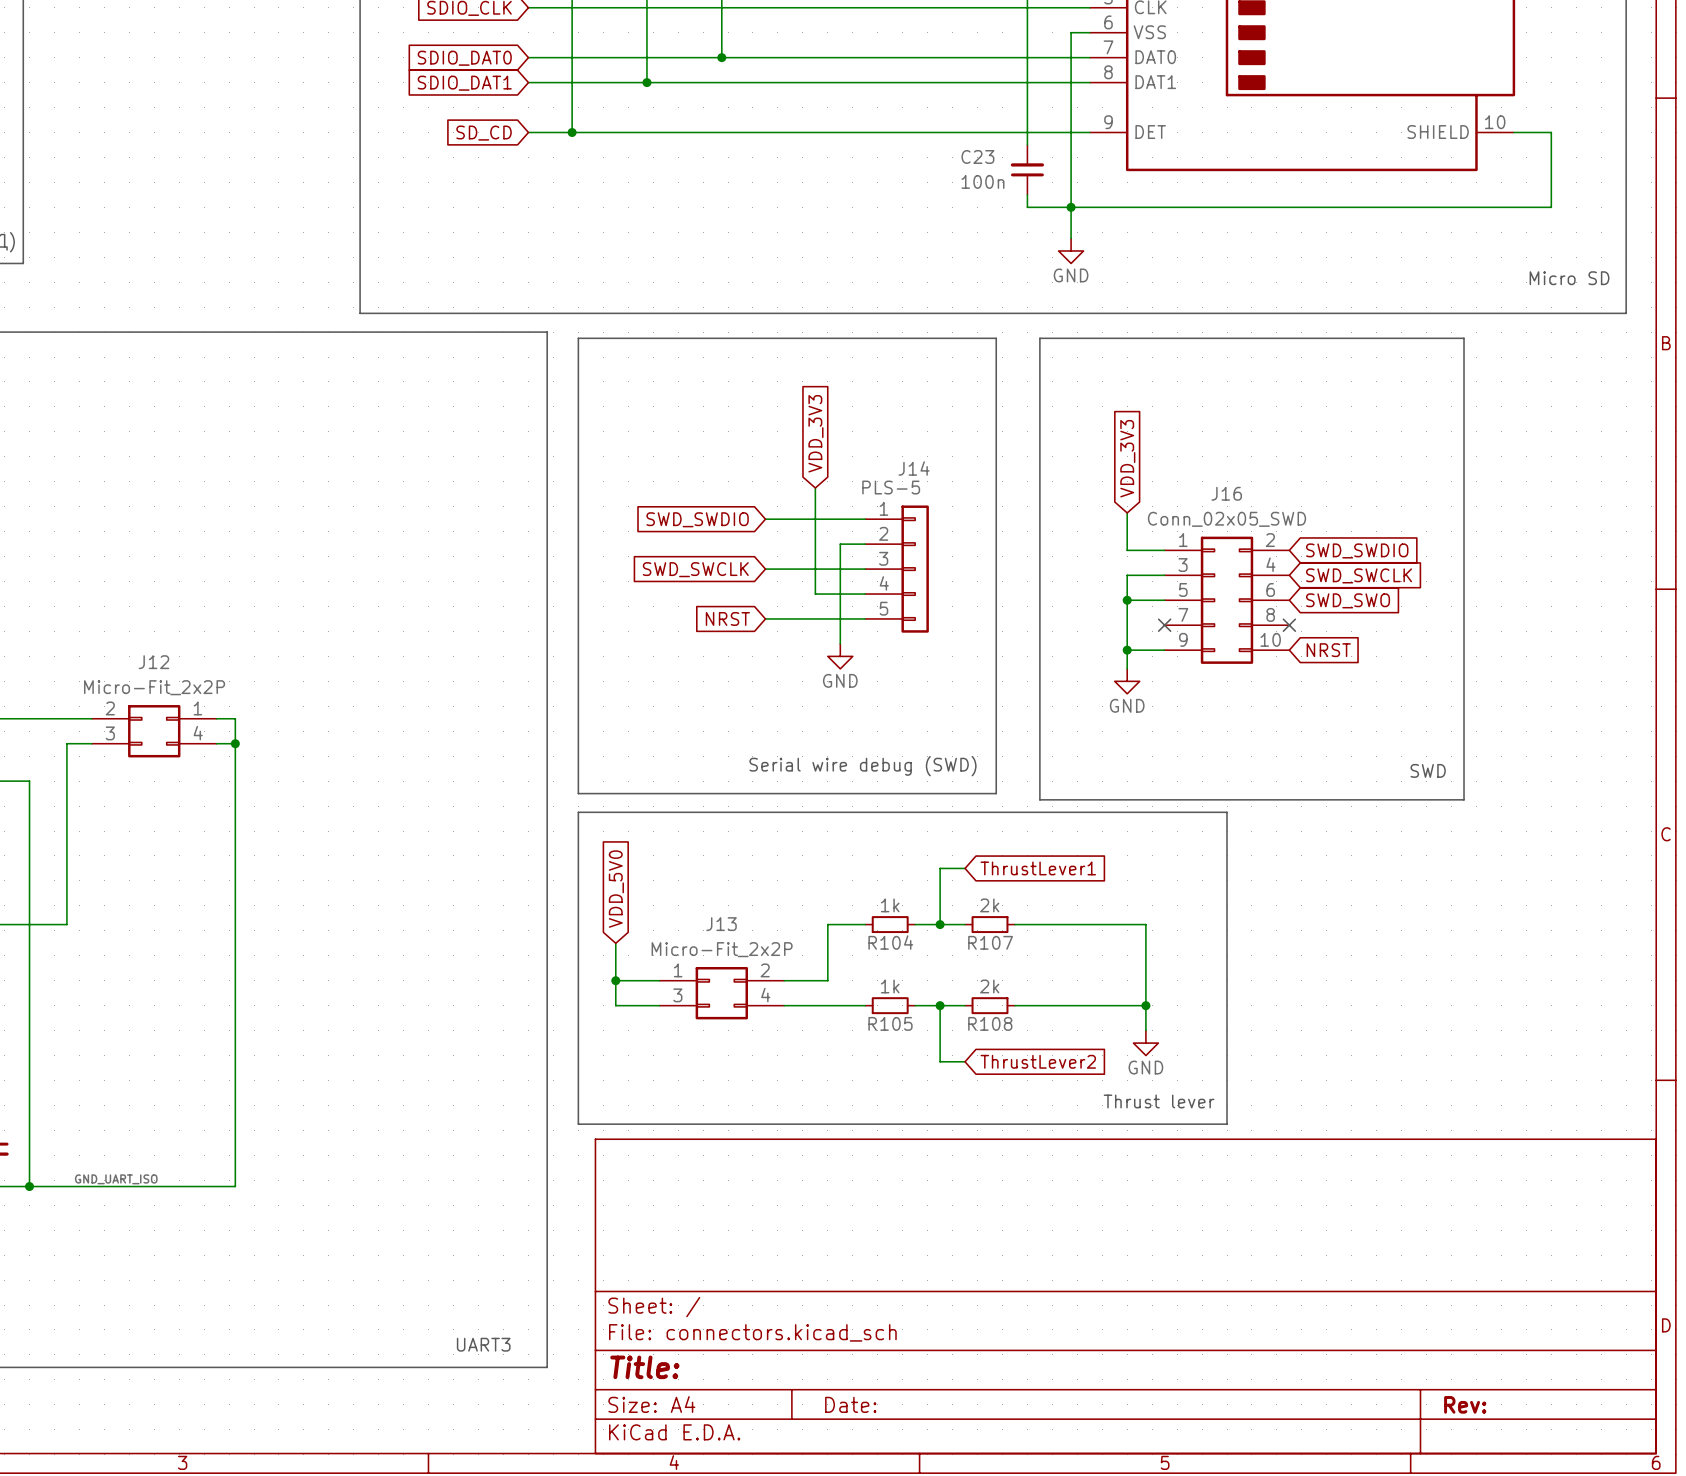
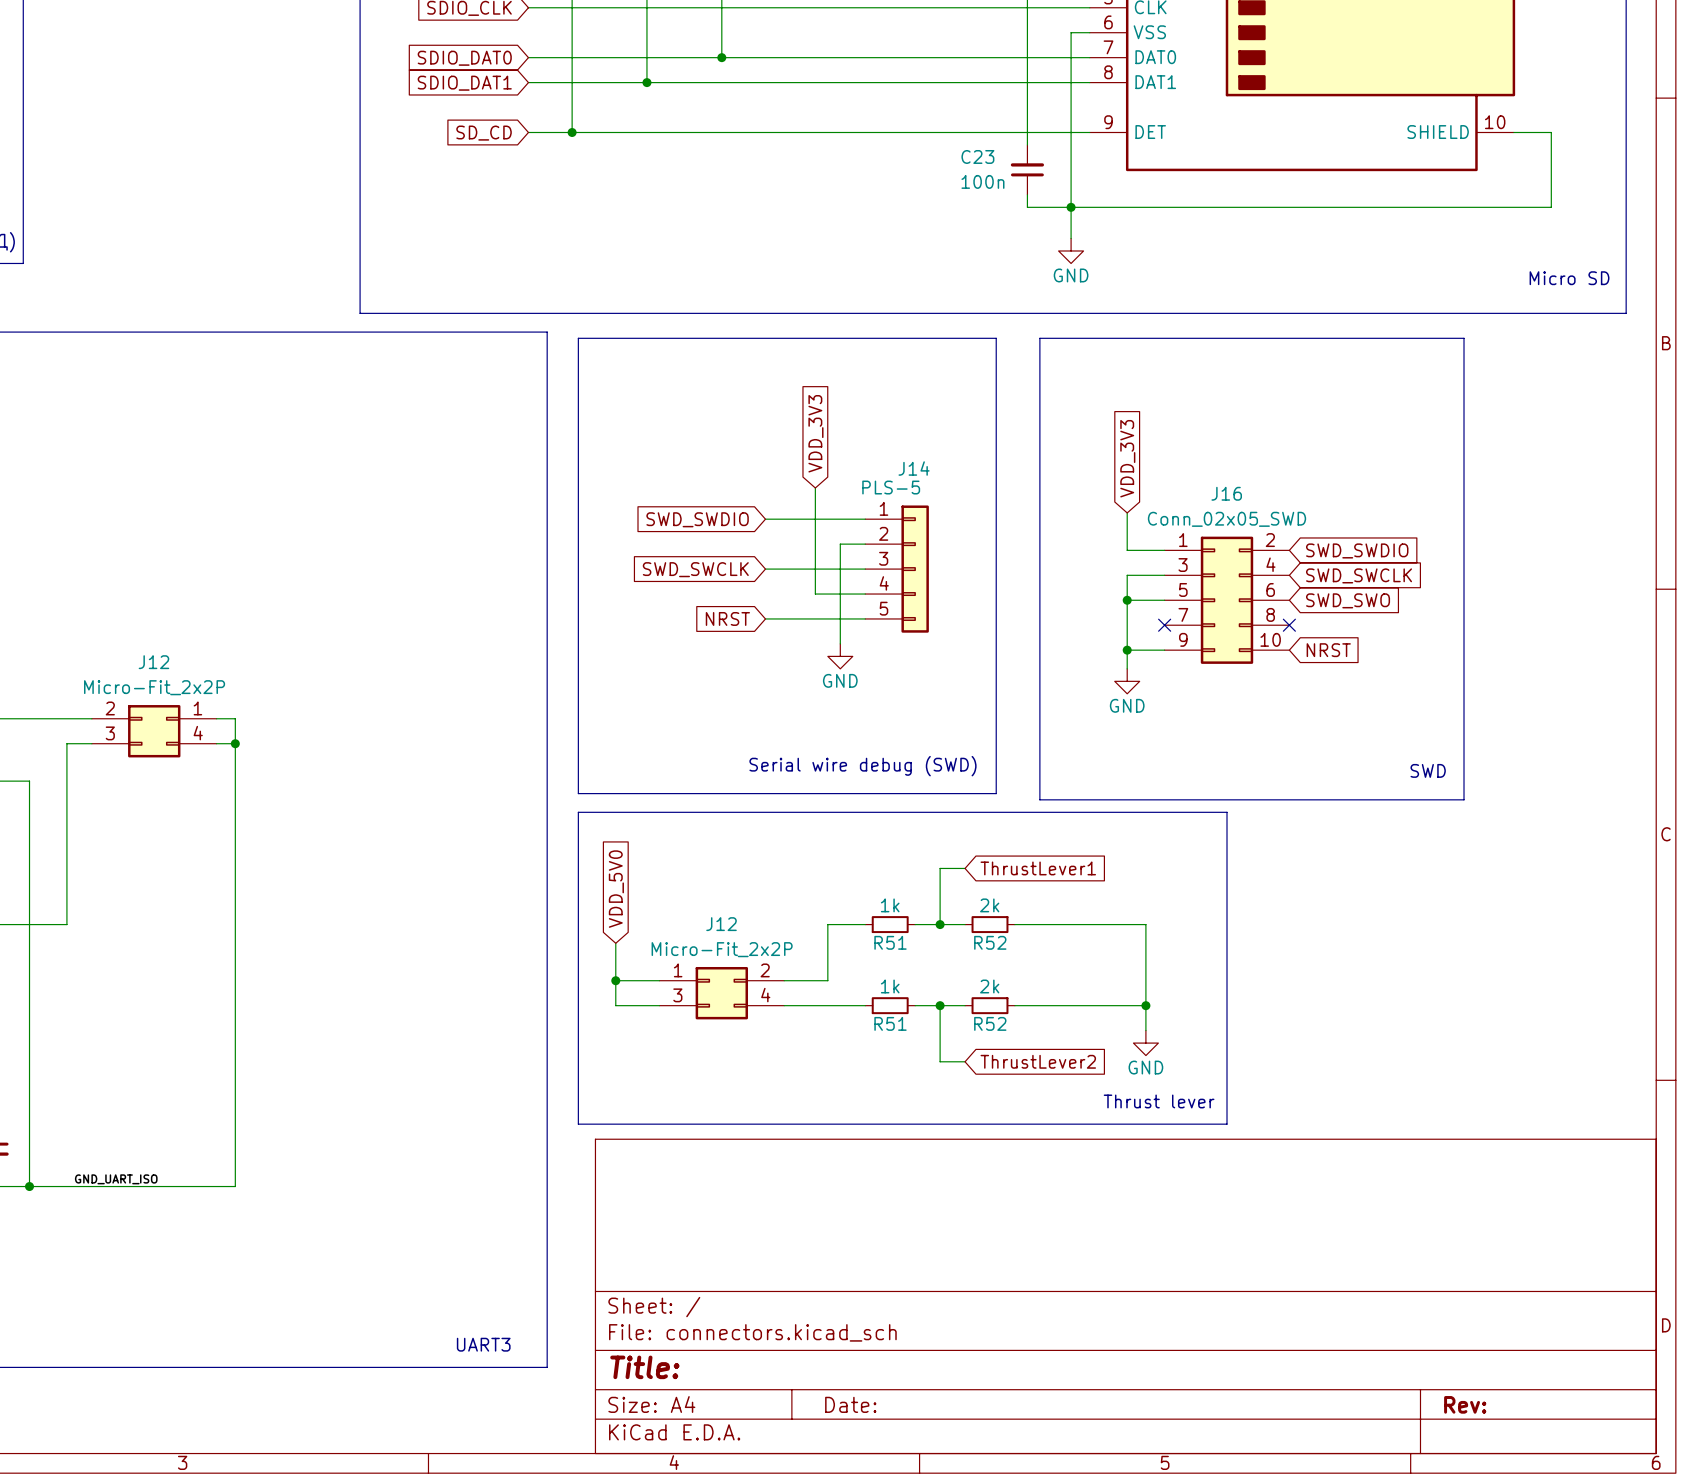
J13 name: J13 (721, 924) -> J12 (721, 924)
R104 name: R104 (890, 942) -> R51 (890, 942)
R107 name: R107 (990, 942) -> R52 (990, 942)
R105 name: R105 (890, 1023) -> R51 (890, 1023)
R108 name: R108 (990, 1023) -> R52 (990, 1023)

